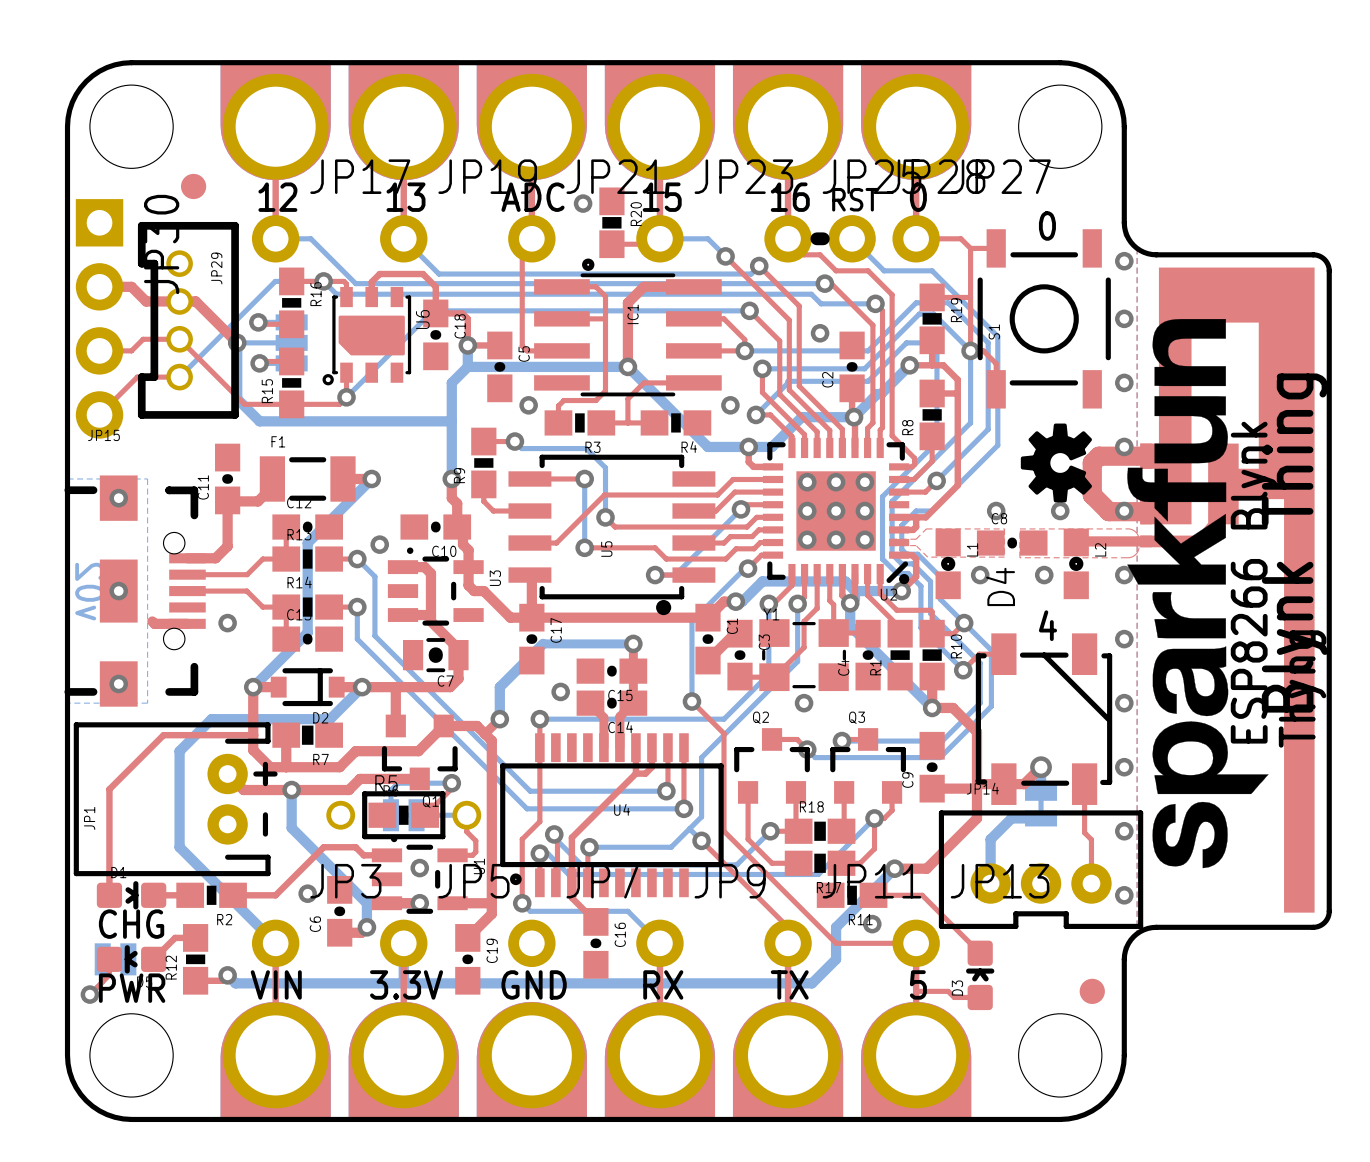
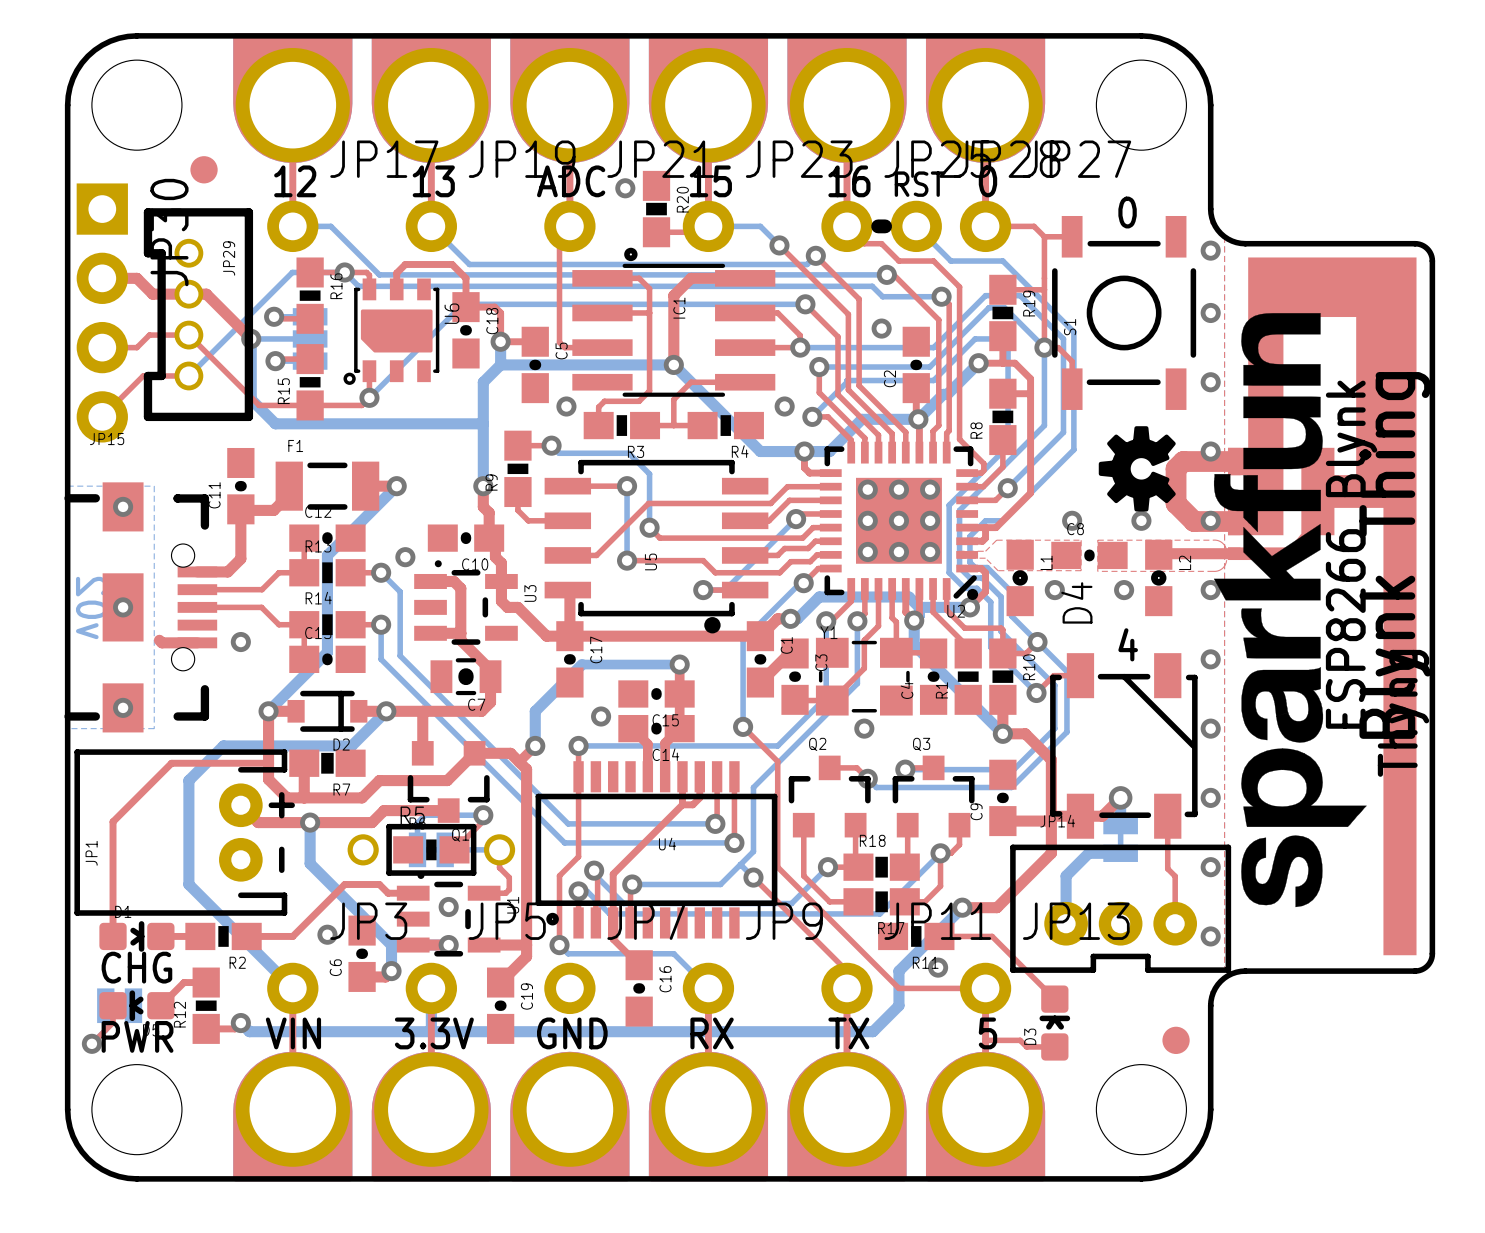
text position: ESP8266 Blynk (1254, 582) -> ESP8266 Blynk (1351, 554)

